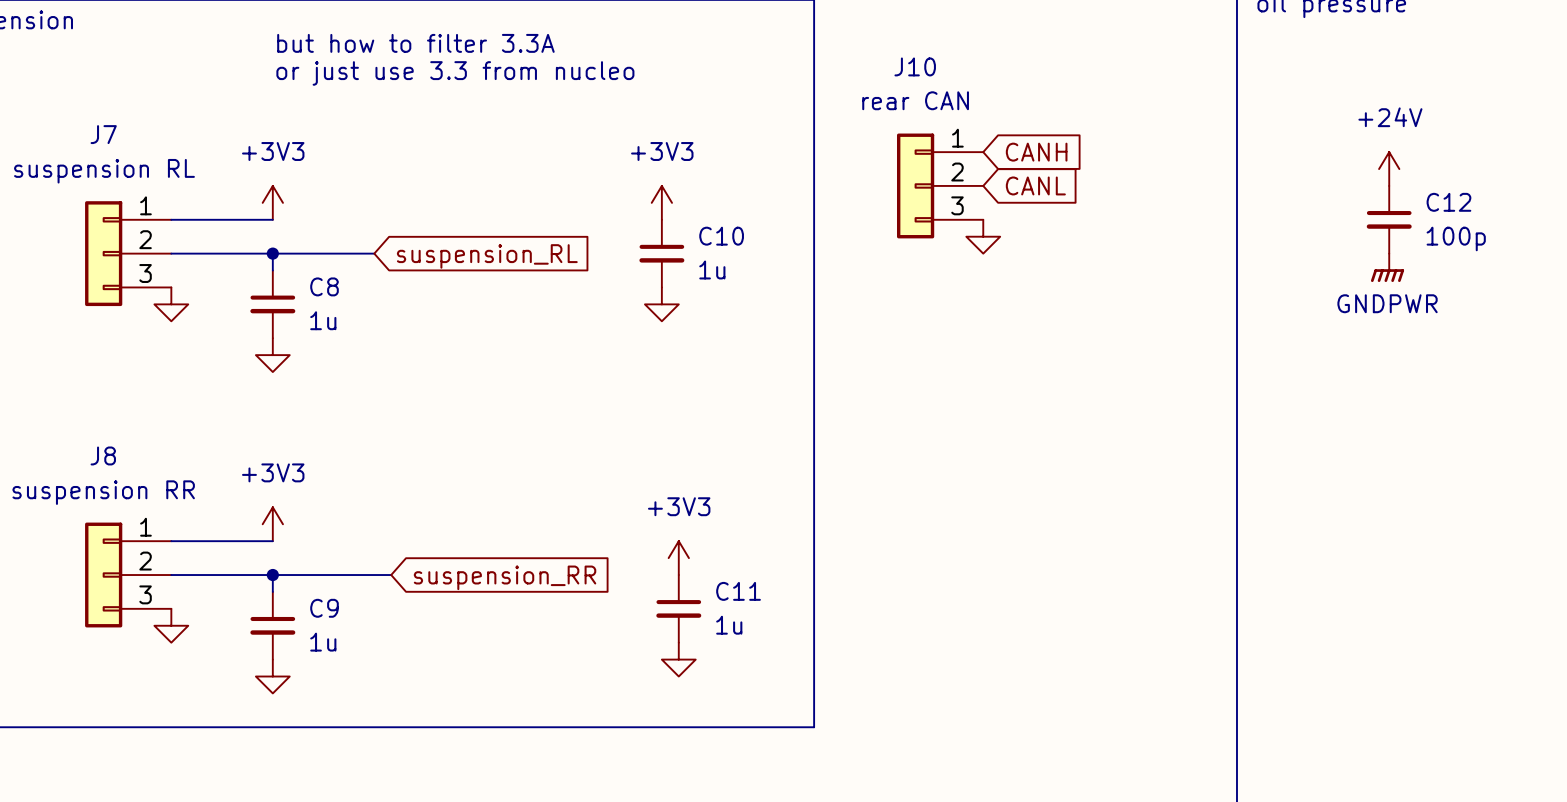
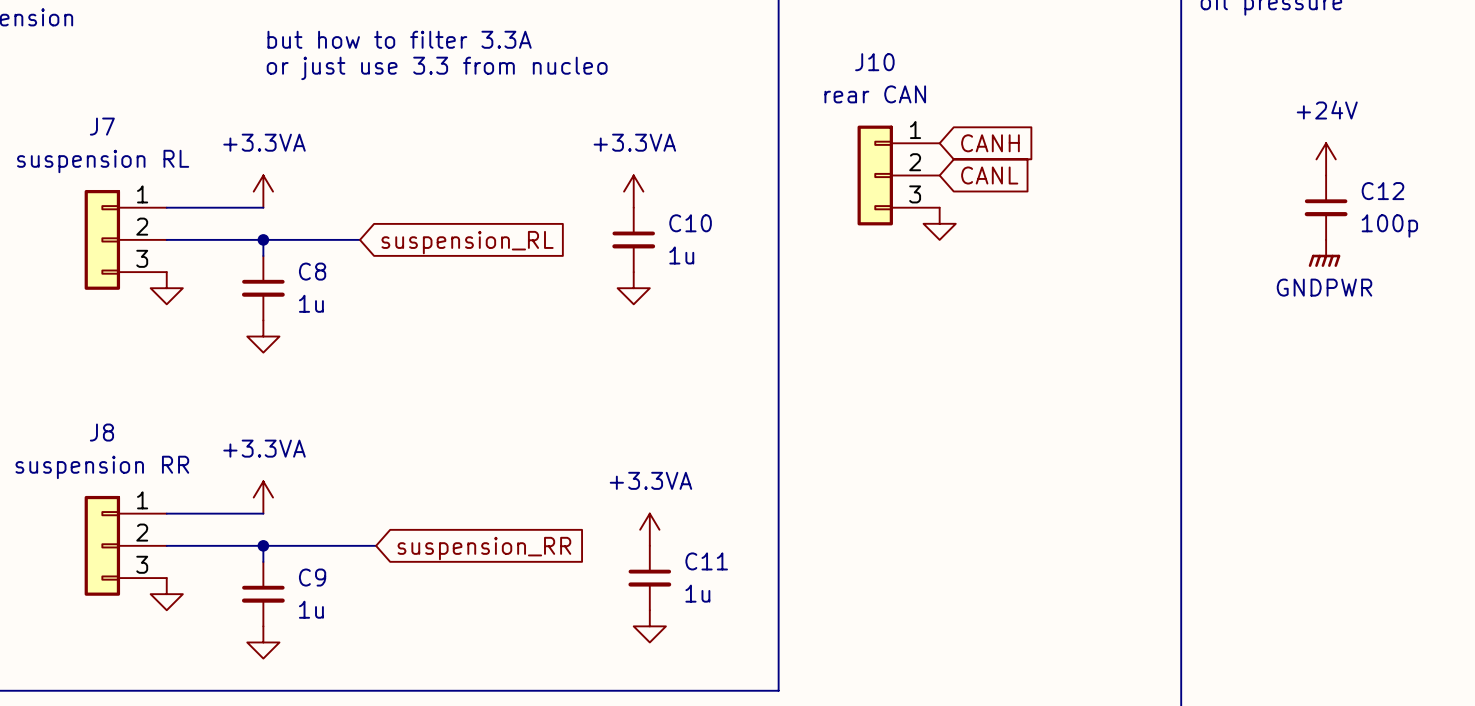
power symbol: +3V3 (272, 202) -> +3.3VA (263, 191)
power symbol: +3V3 (661, 202) -> +3.3VA (633, 191)
power symbol: +3V3 (272, 524) -> +3.3VA (263, 497)
power symbol: +3V3 (678, 558) -> +3.3VA (649, 529)

